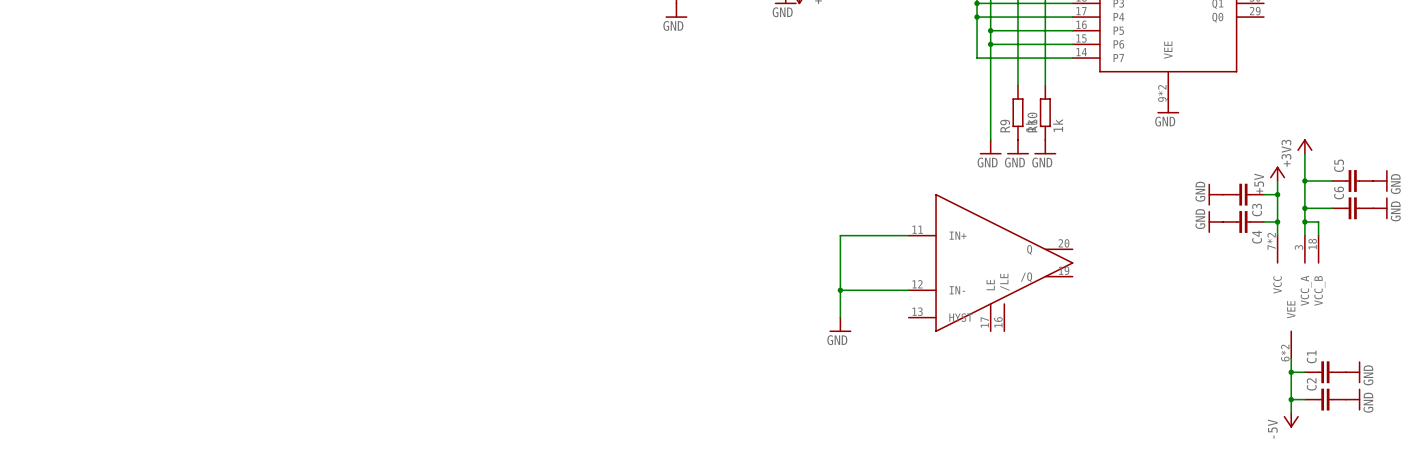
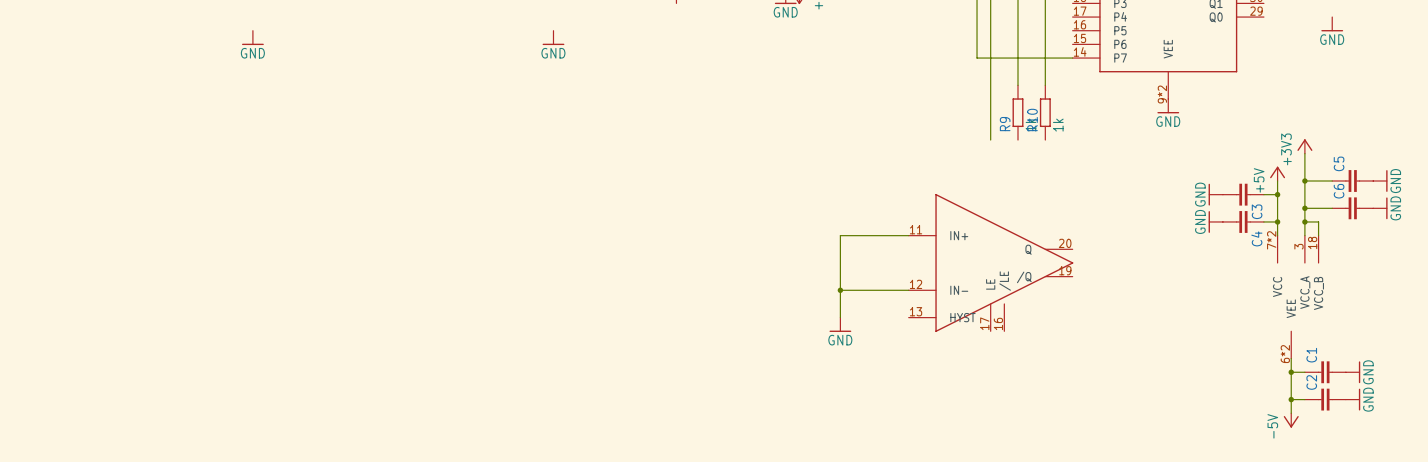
wire: (977, 3) (1072, 3) -> none
junction: (977, 3) -> none
power symbol: GND (676, 10) -> none
wire: (977, 17) (1072, 17) -> none
junction: (977, 17) -> none
power symbol: none -> GND (1332, 24)
wire: (990, 30) (1072, 30) -> none
junction: (990, 30) -> none
power symbol: none -> GND (252, 37)
power symbol: none -> GND (553, 37)
wire: (990, 44) (1072, 44) -> none
junction: (990, 44) -> none
power symbol: GND (990, 147) -> none
power symbol: GND (1018, 147) -> none
power symbol: GND (1045, 147) -> none

